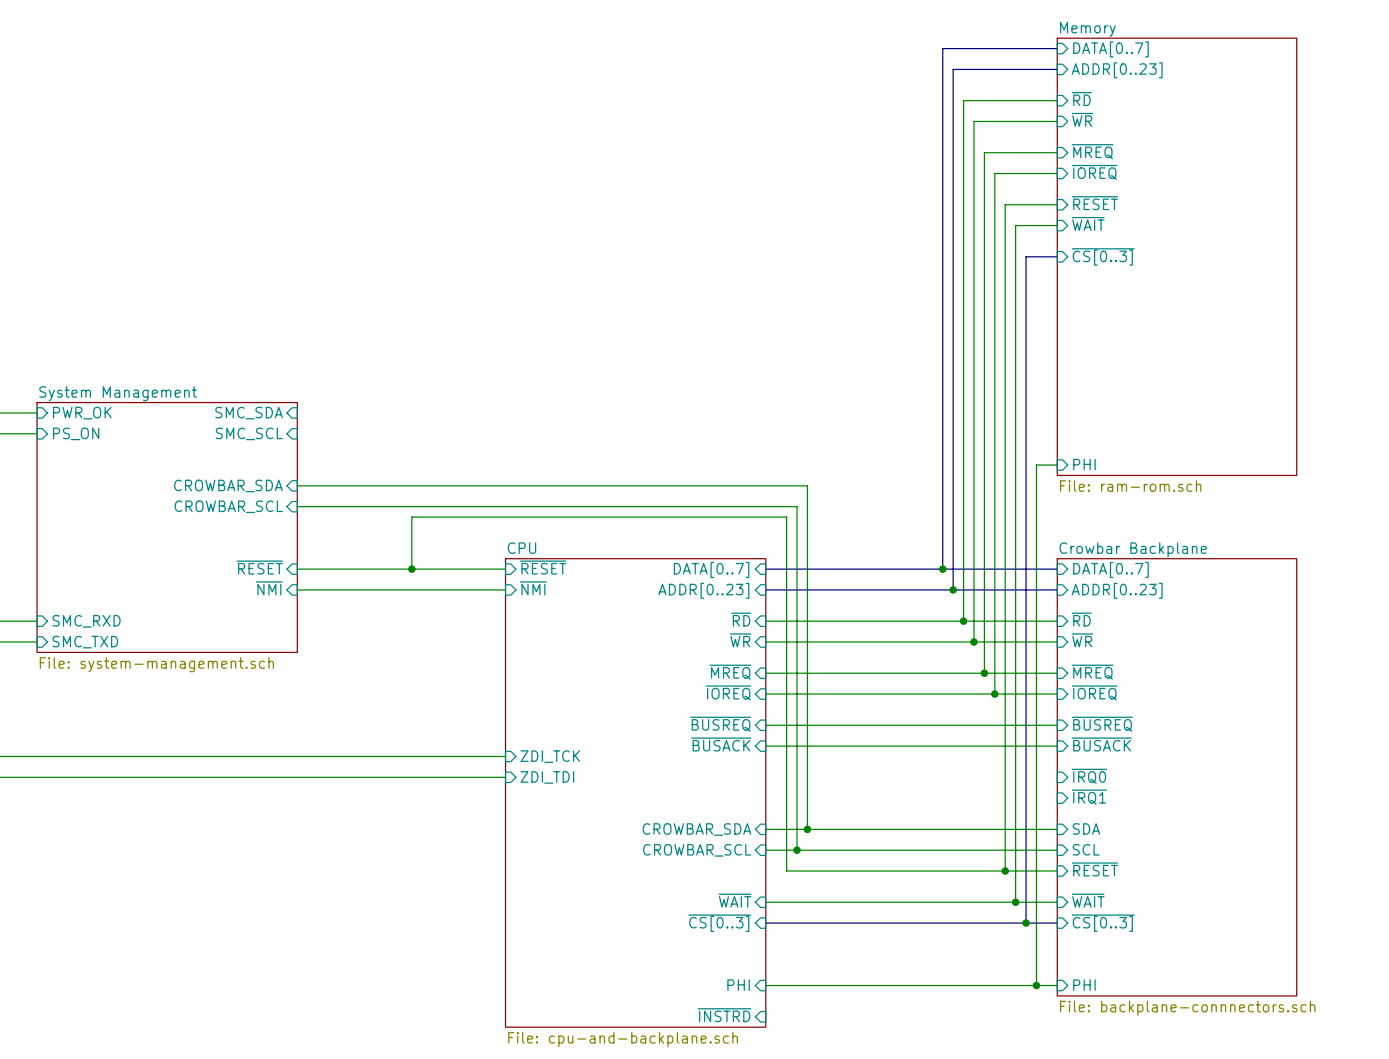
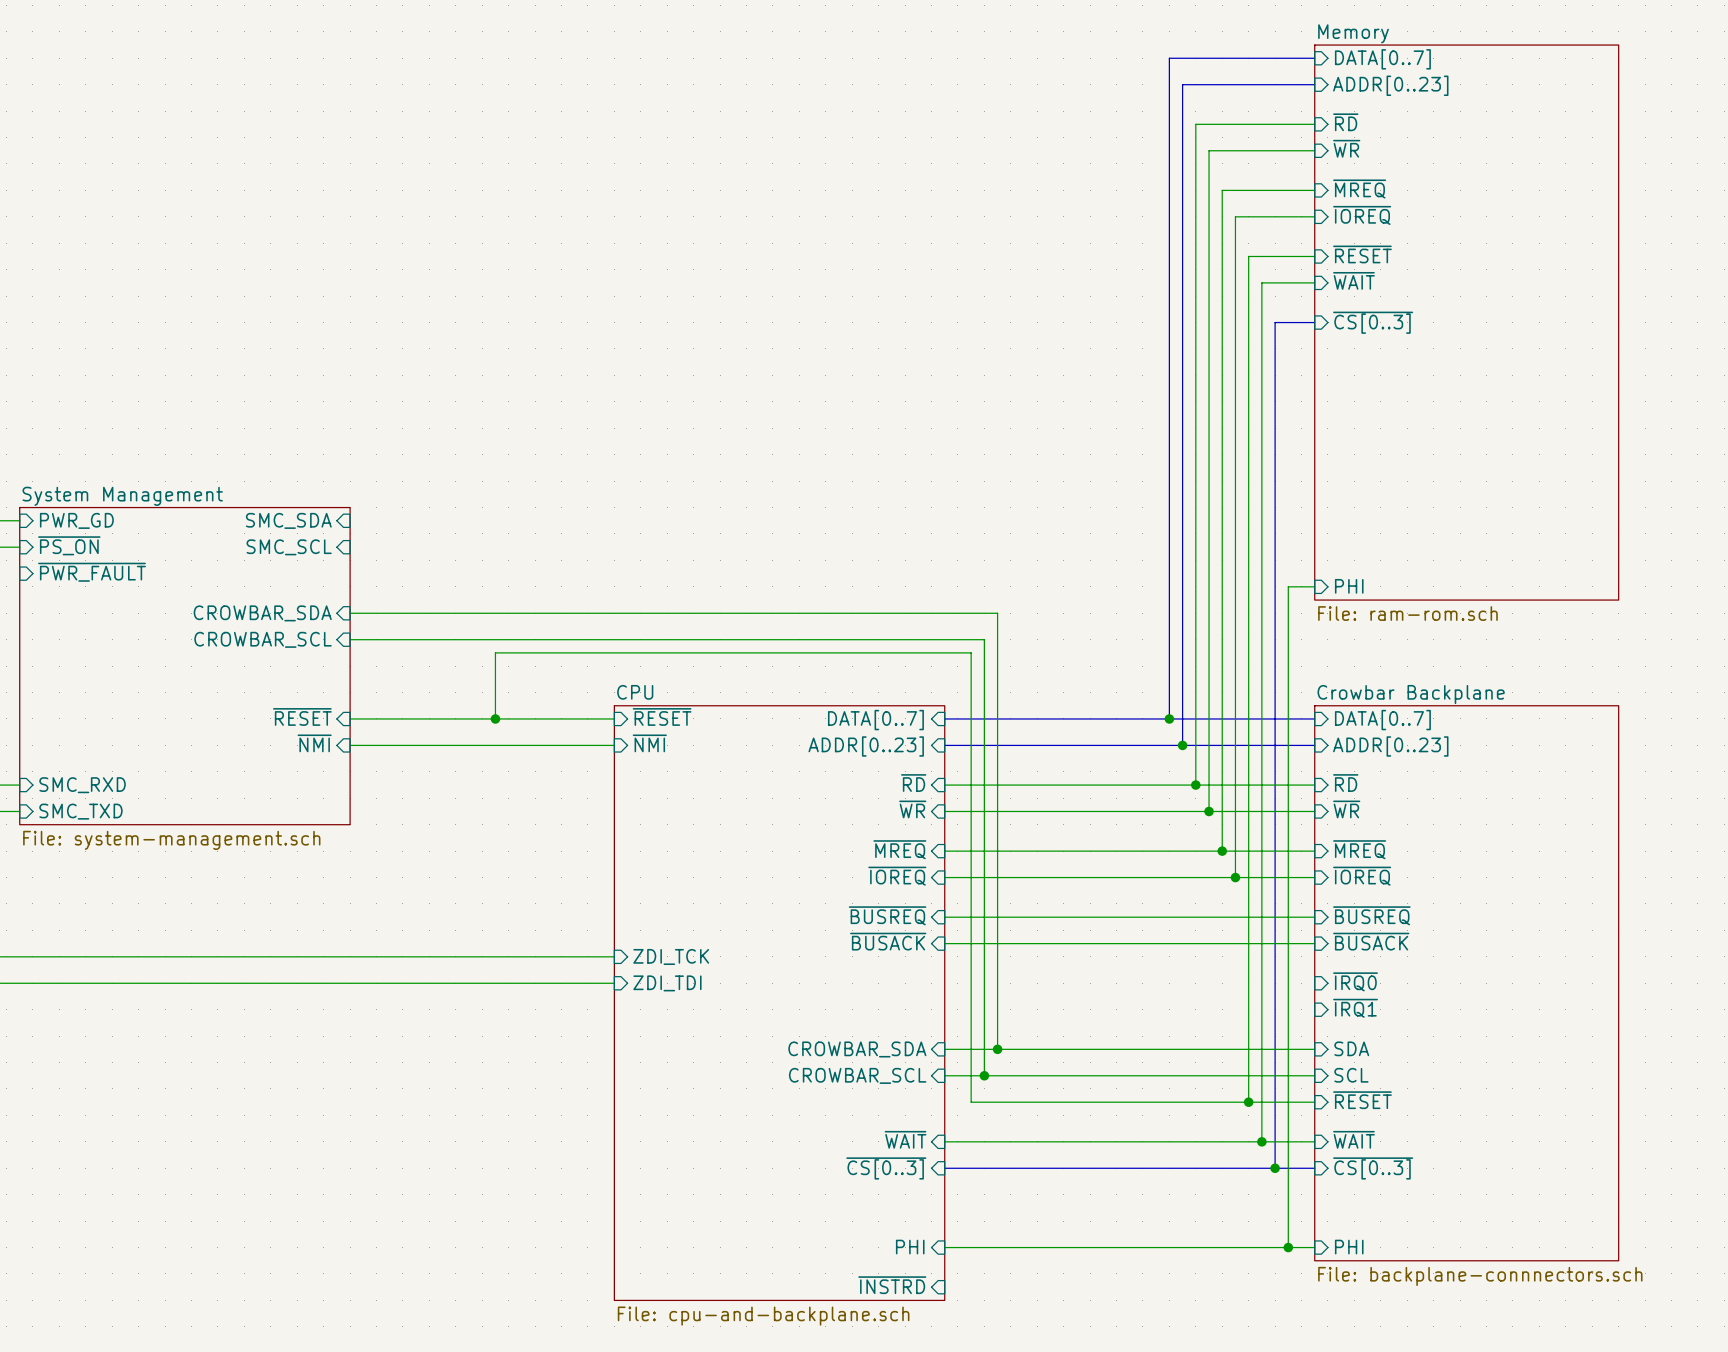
sheet pin: PWR_OK (82, 413) -> PWR_GD (76, 520)
sheet pin: PS_ON (76, 433) -> ~{PS_ON} (69, 545)
sheet pin: none -> ~{PWR_FAULT} (92, 572)

